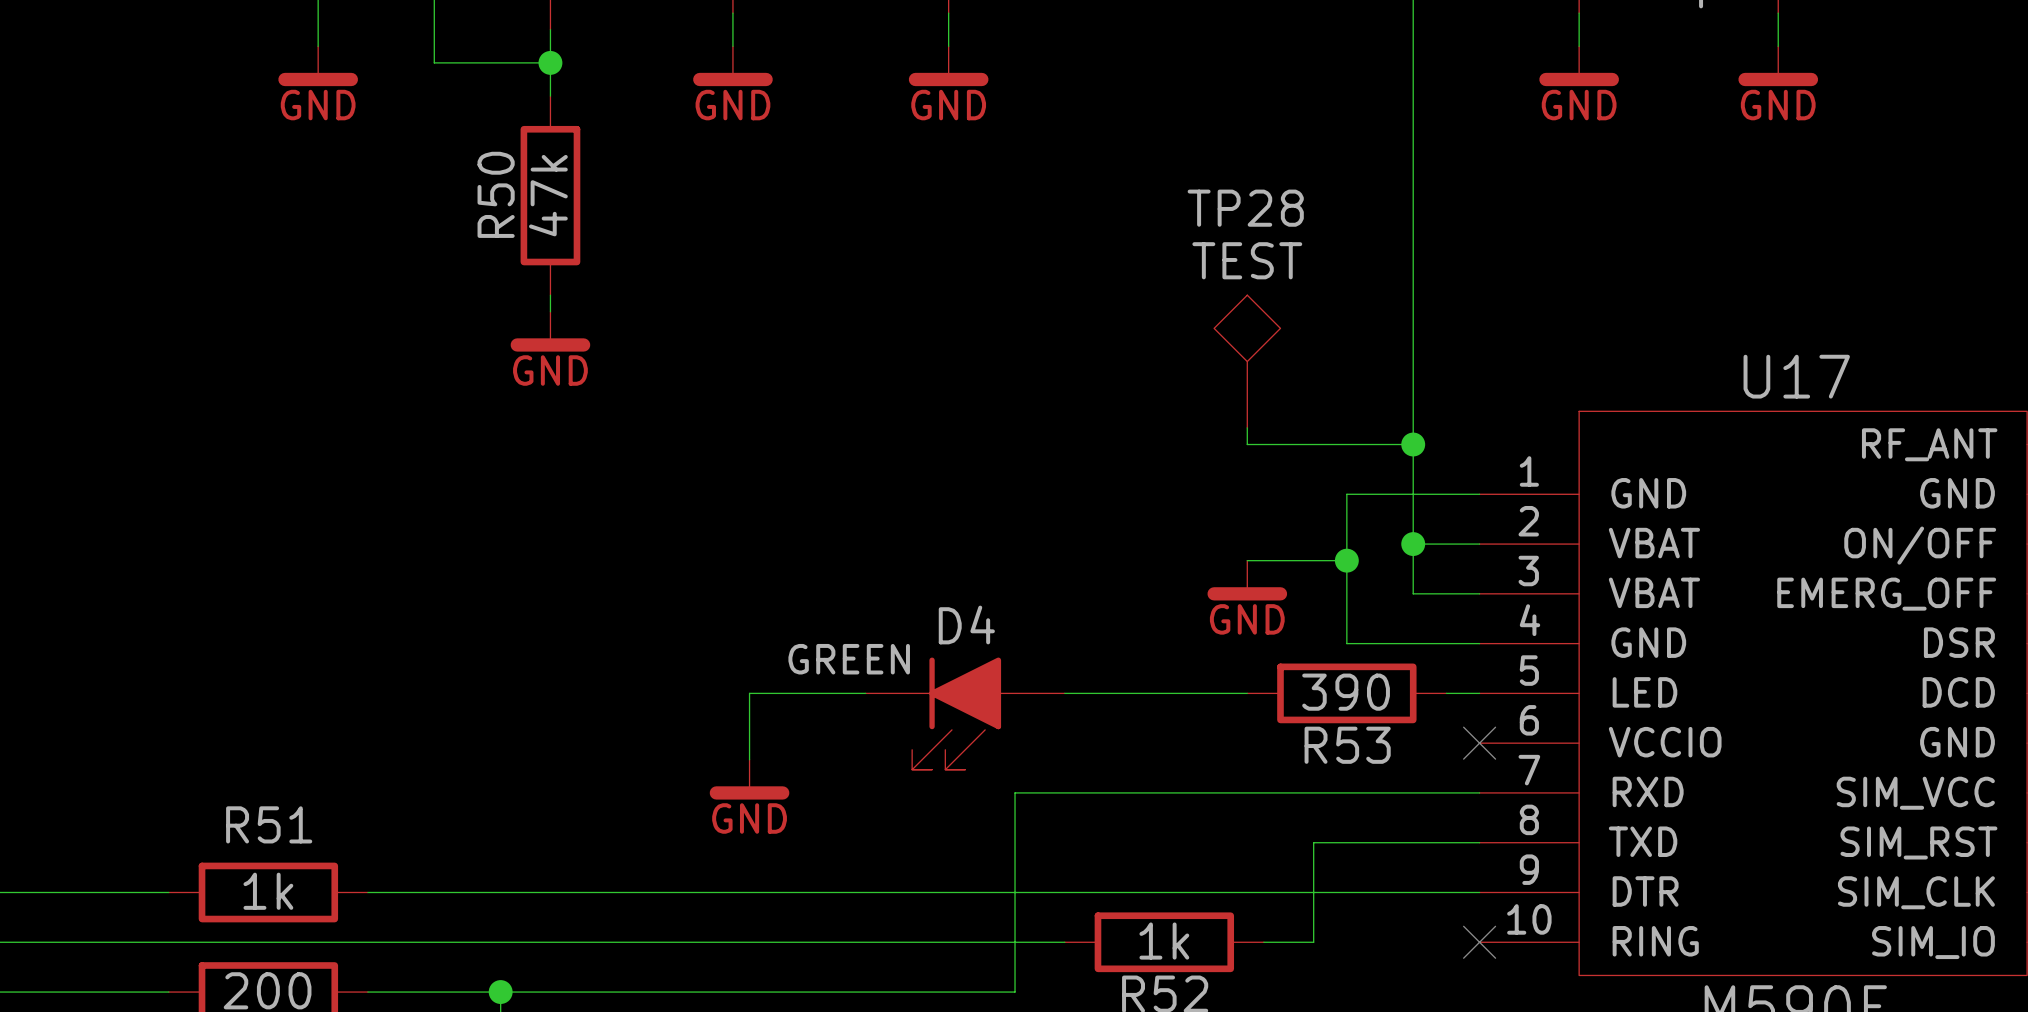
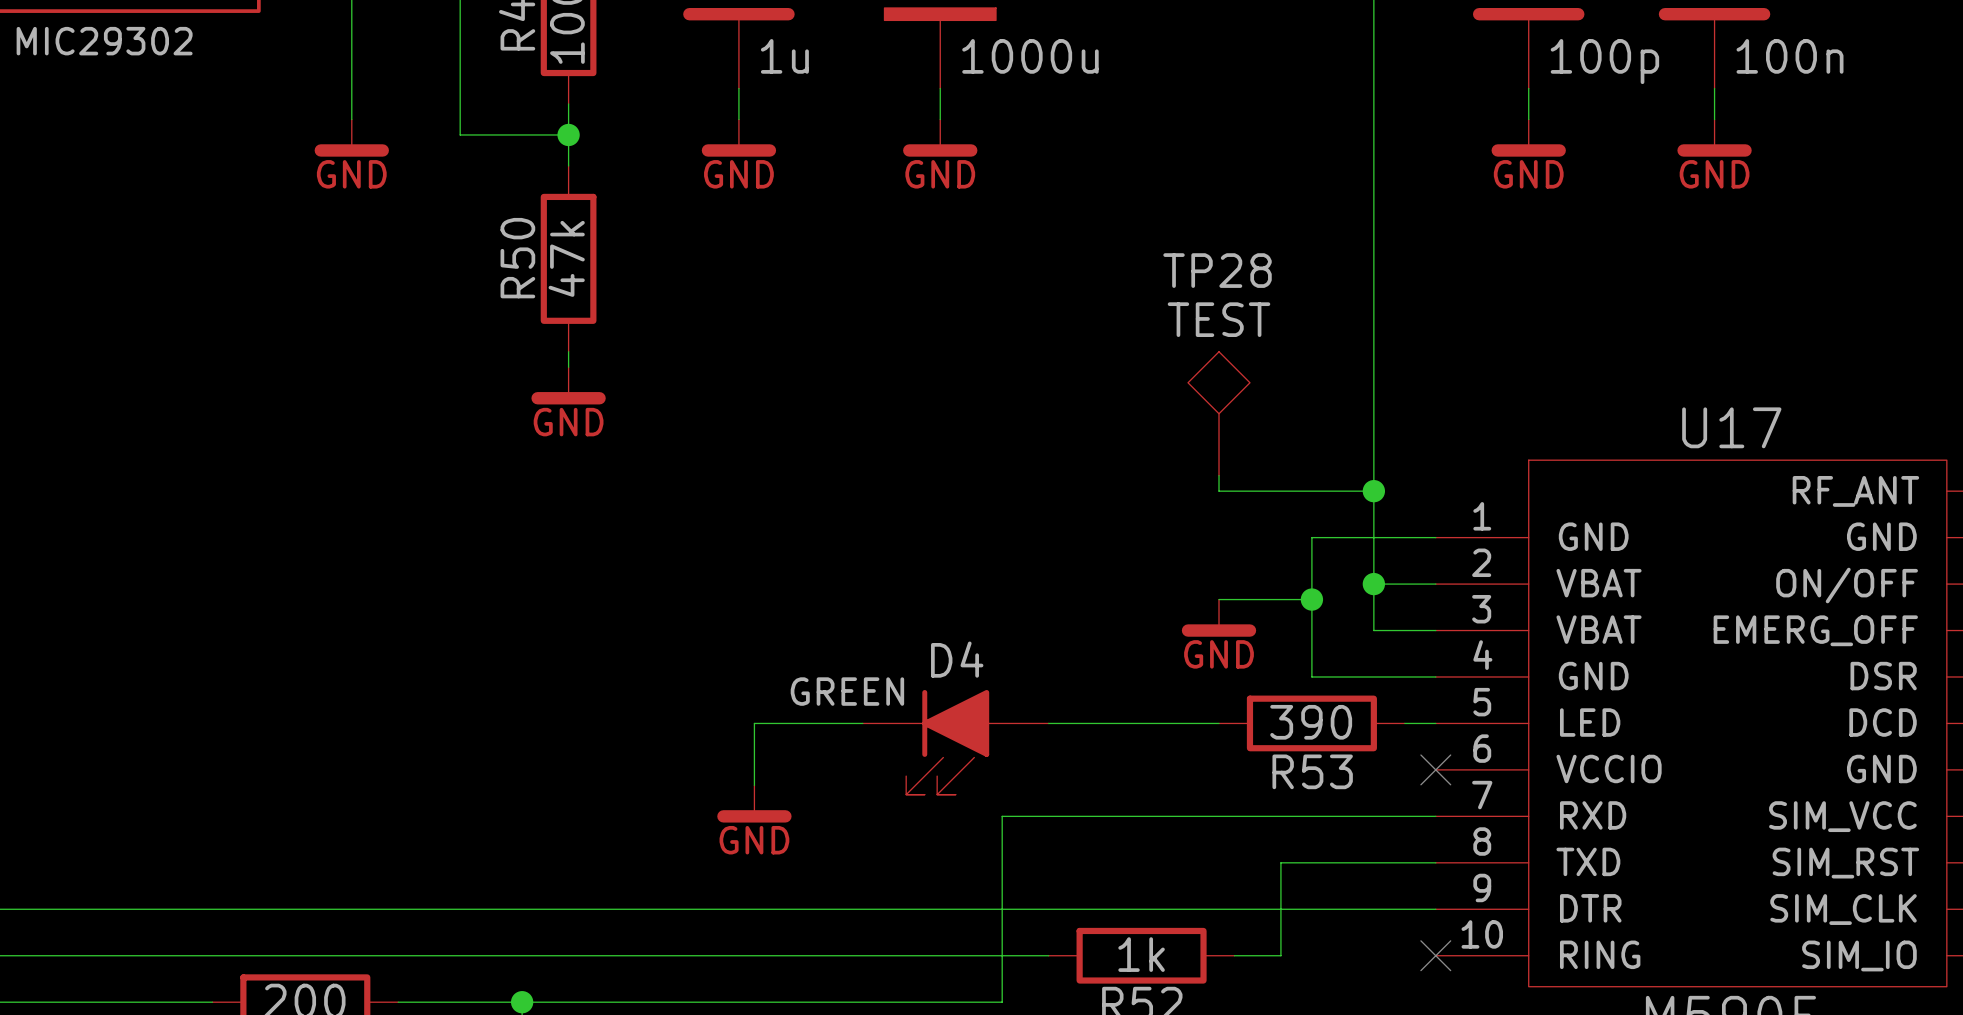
wire: none -> (212, 909) (398, 909)
R51: 1k (268, 892) -> none

